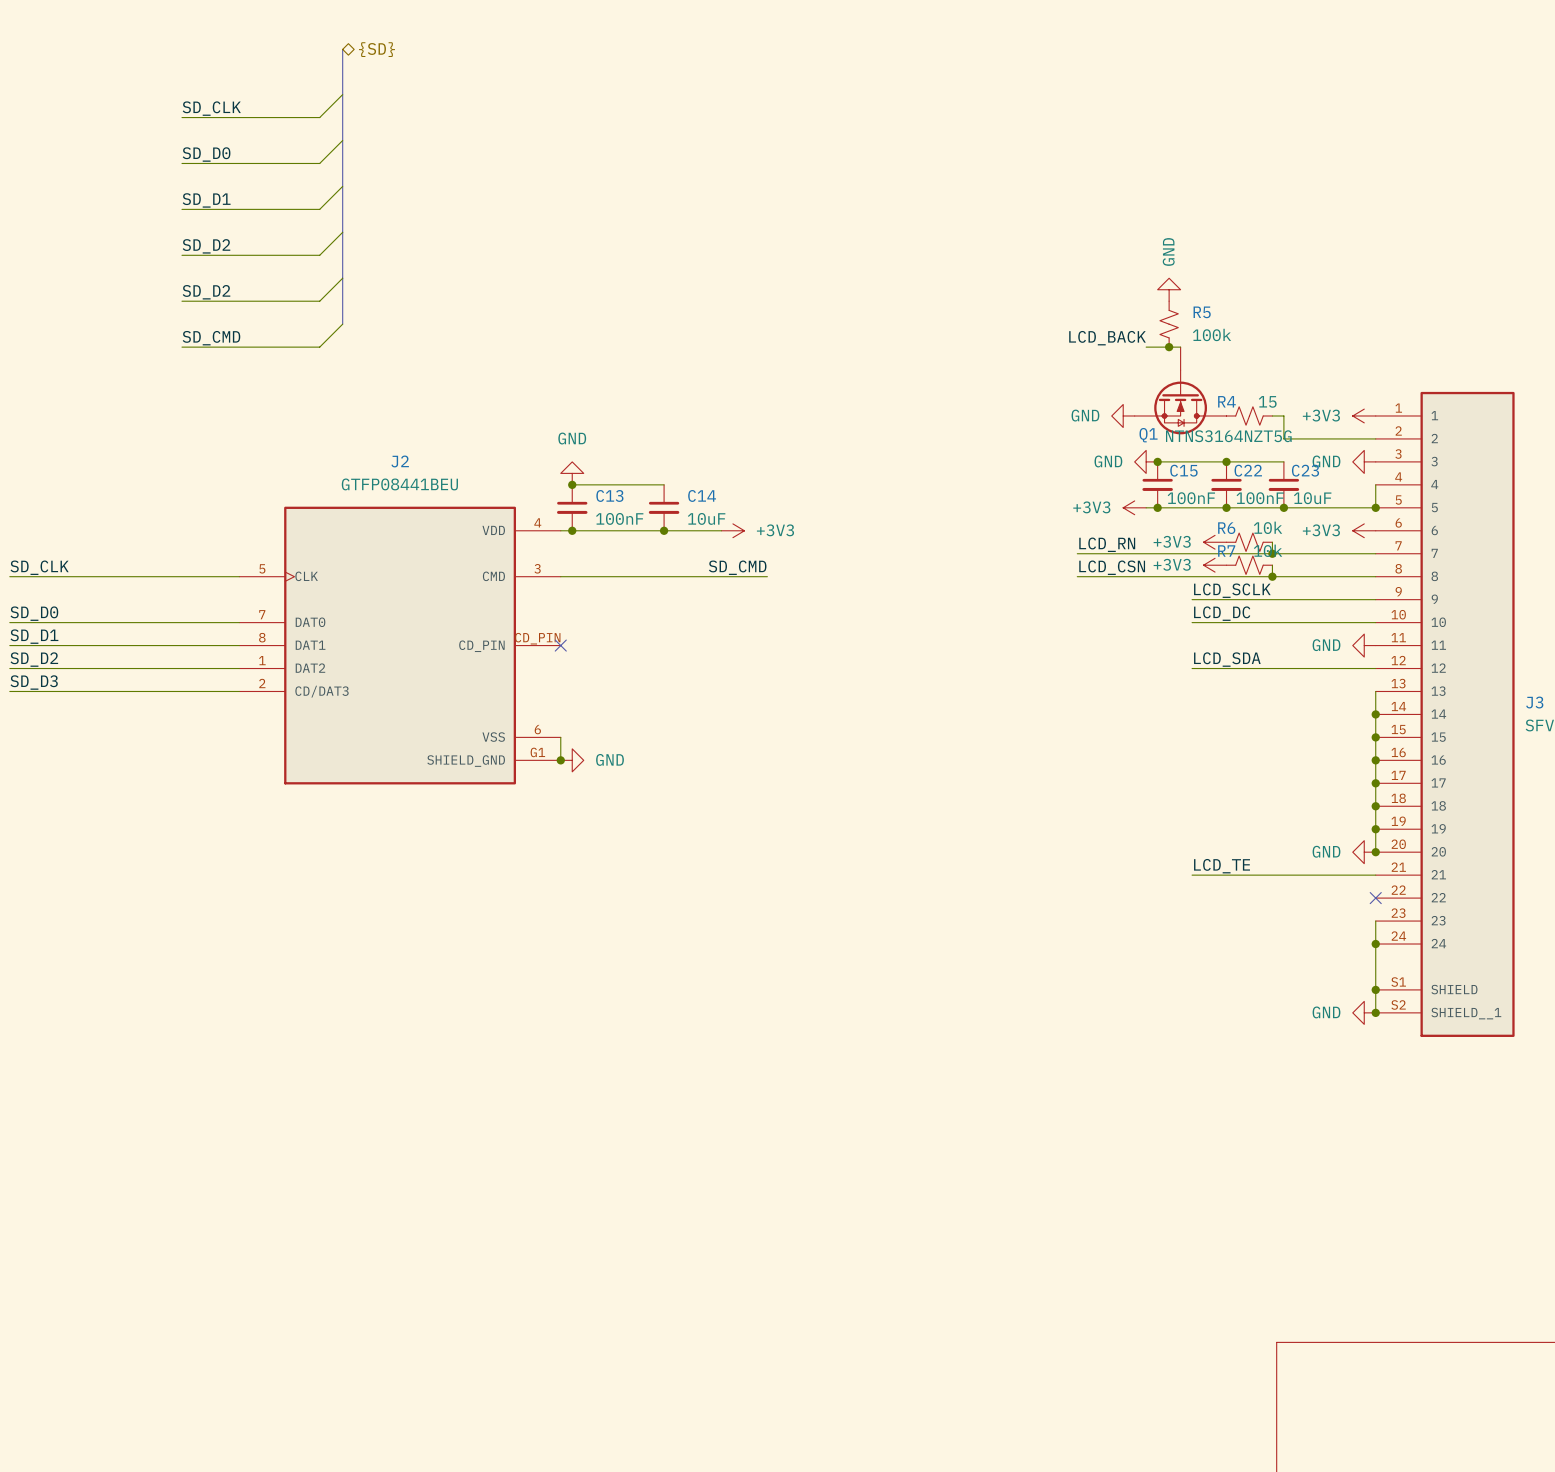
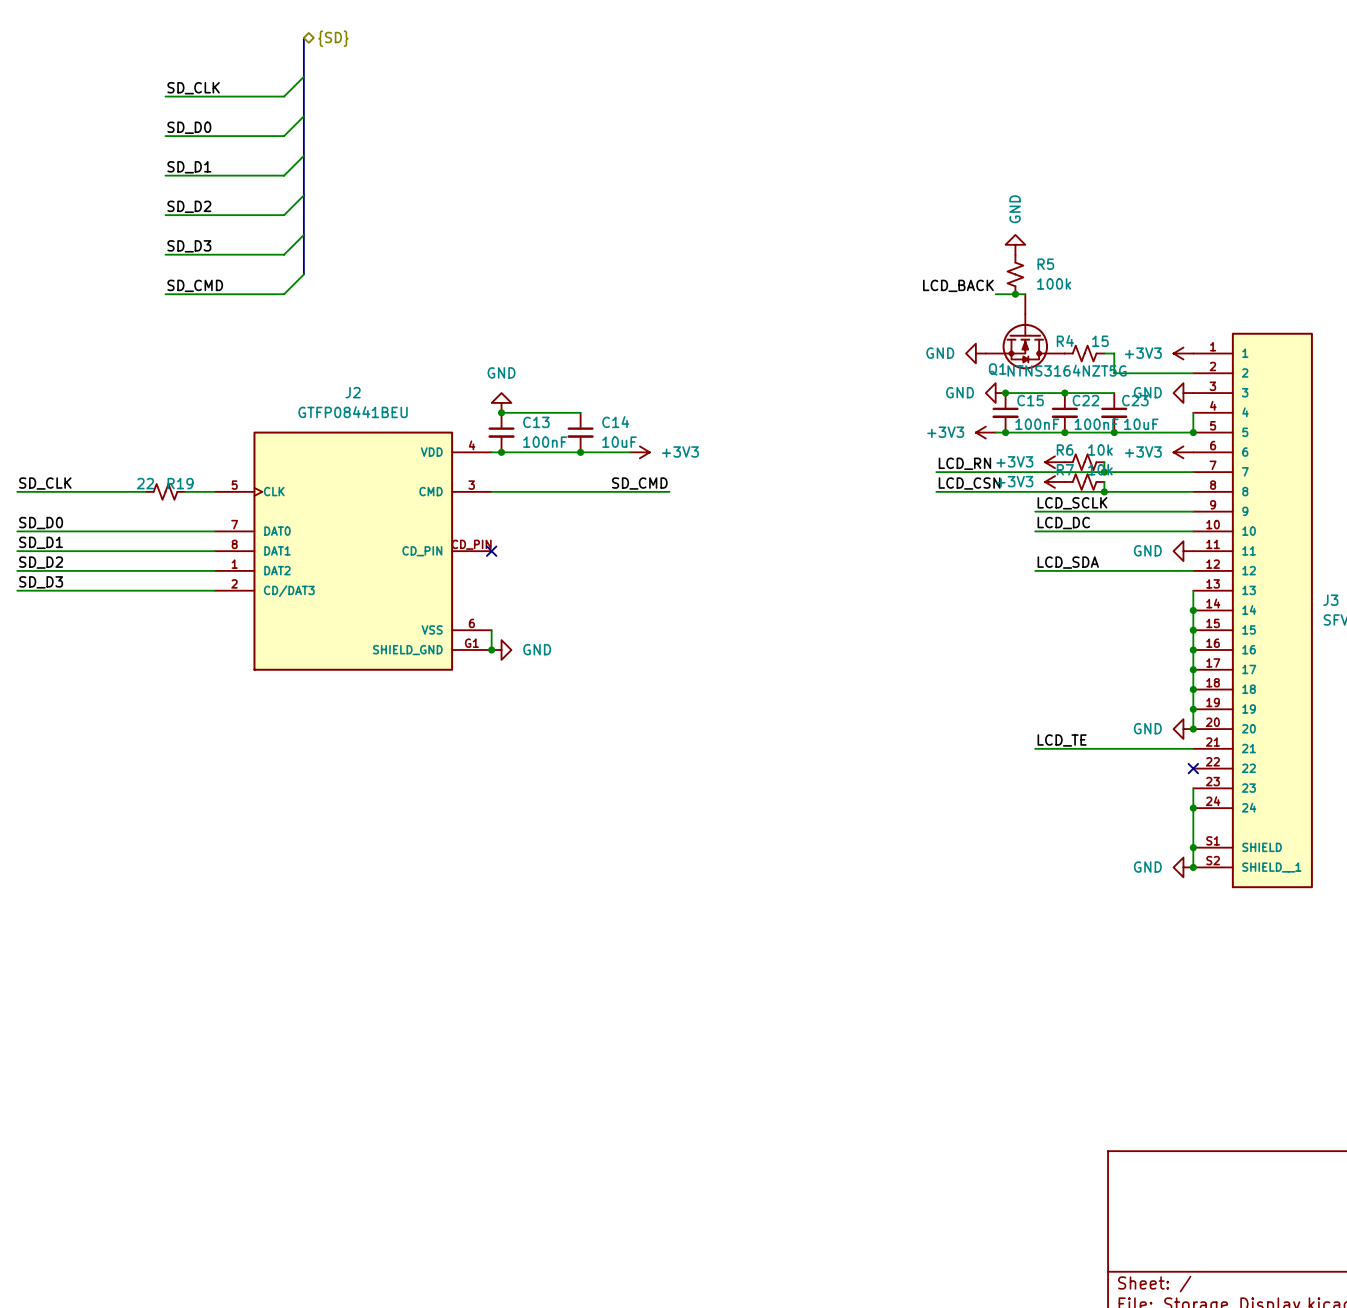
label: SD_D2 (206, 292) -> SD_D3 (189, 246)
R19: none -> 22 (165, 491)

